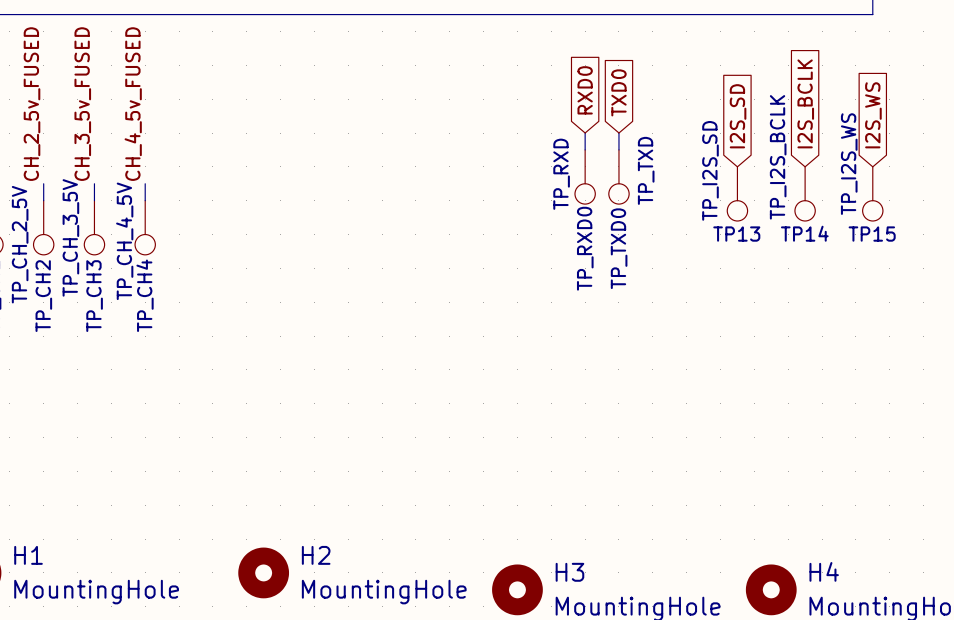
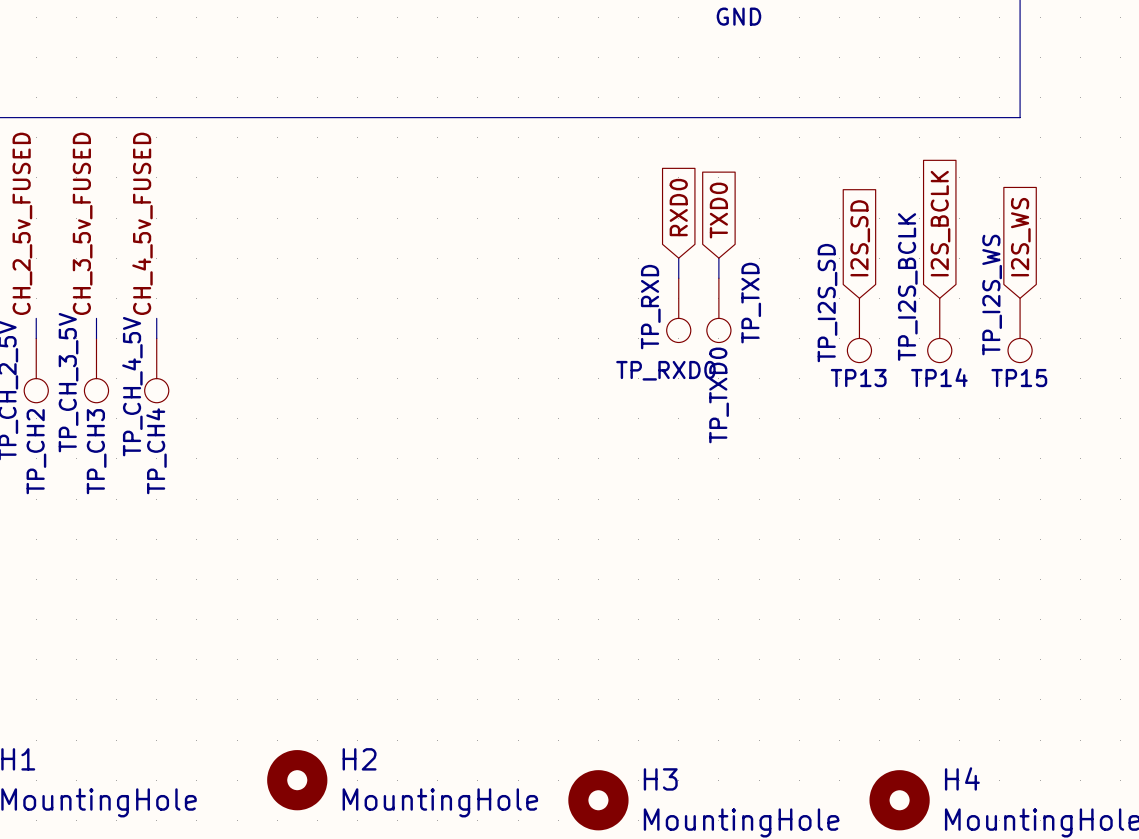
TP_RXD0 name rotation: 0° (585, 248) -> 90° clockwise (665, 370)

